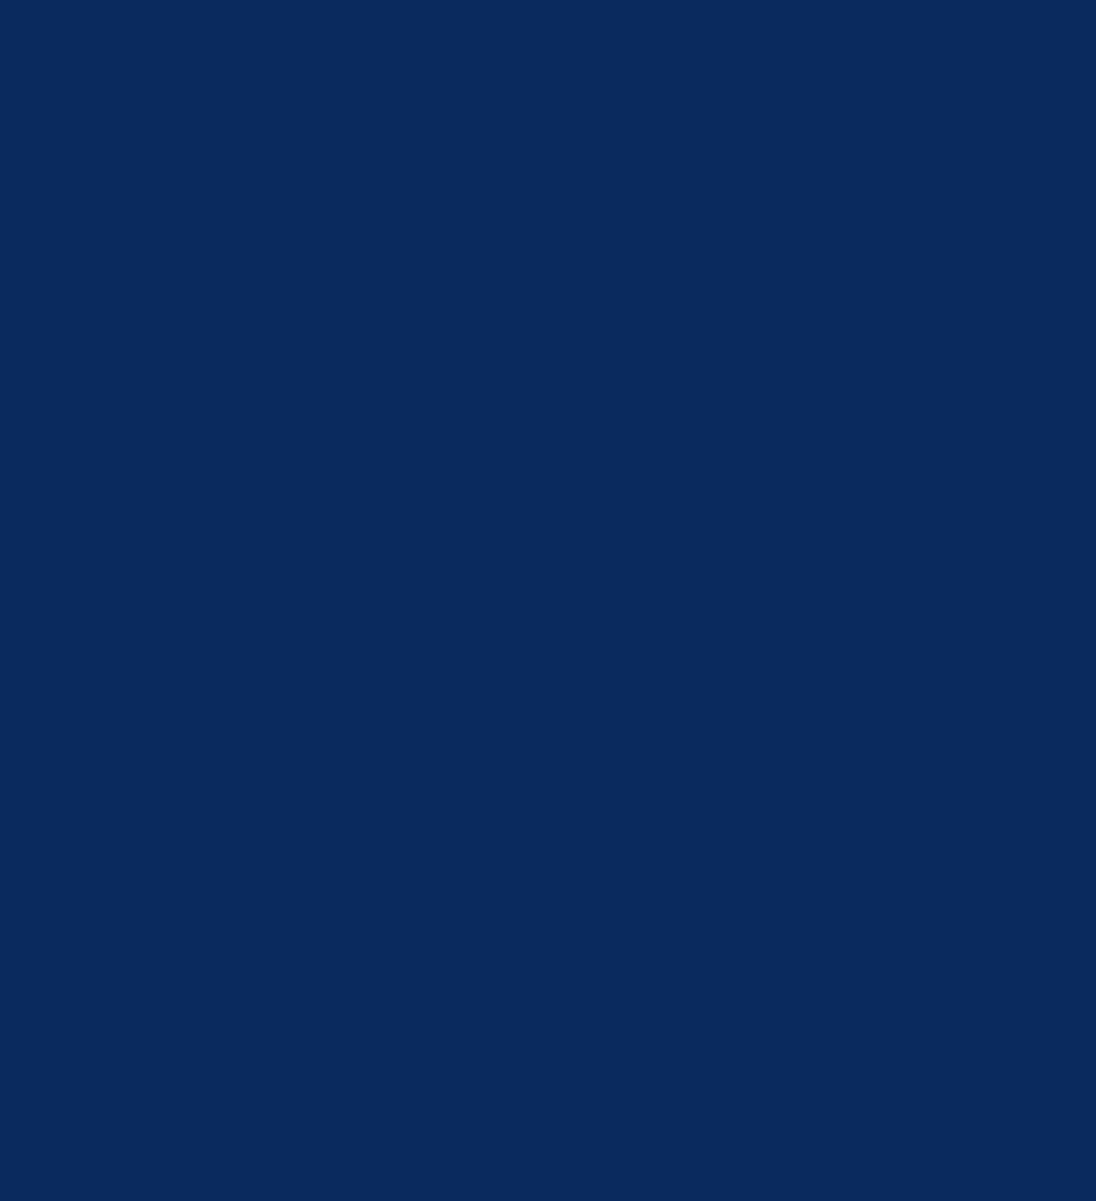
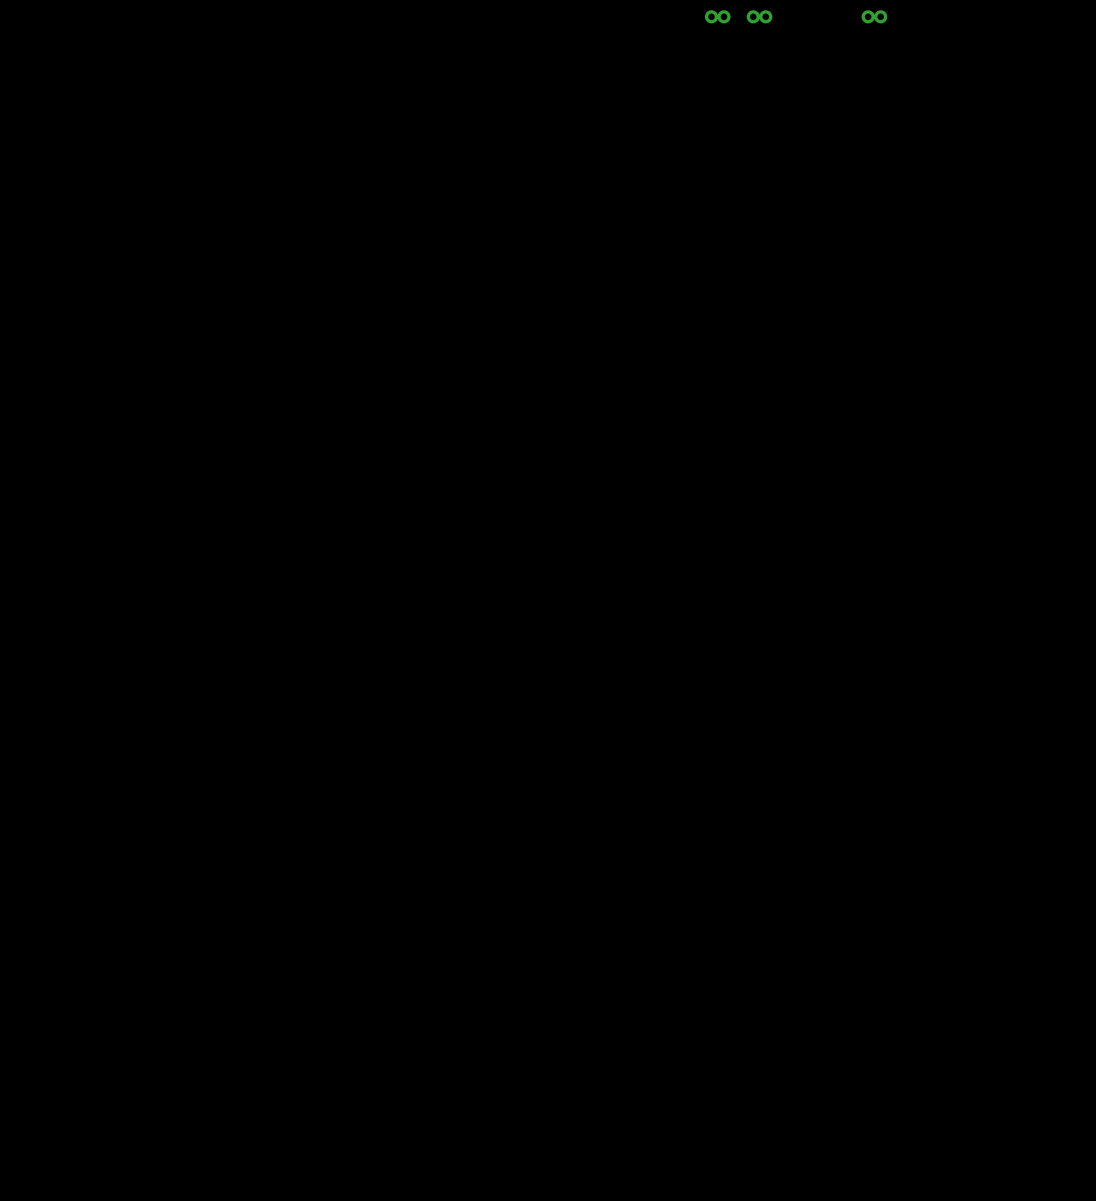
part: none -> (711, 16)
part: none -> (724, 16)
part: none -> (753, 16)
part: none -> (765, 16)
part: none -> (868, 16)
part: none -> (880, 16)

